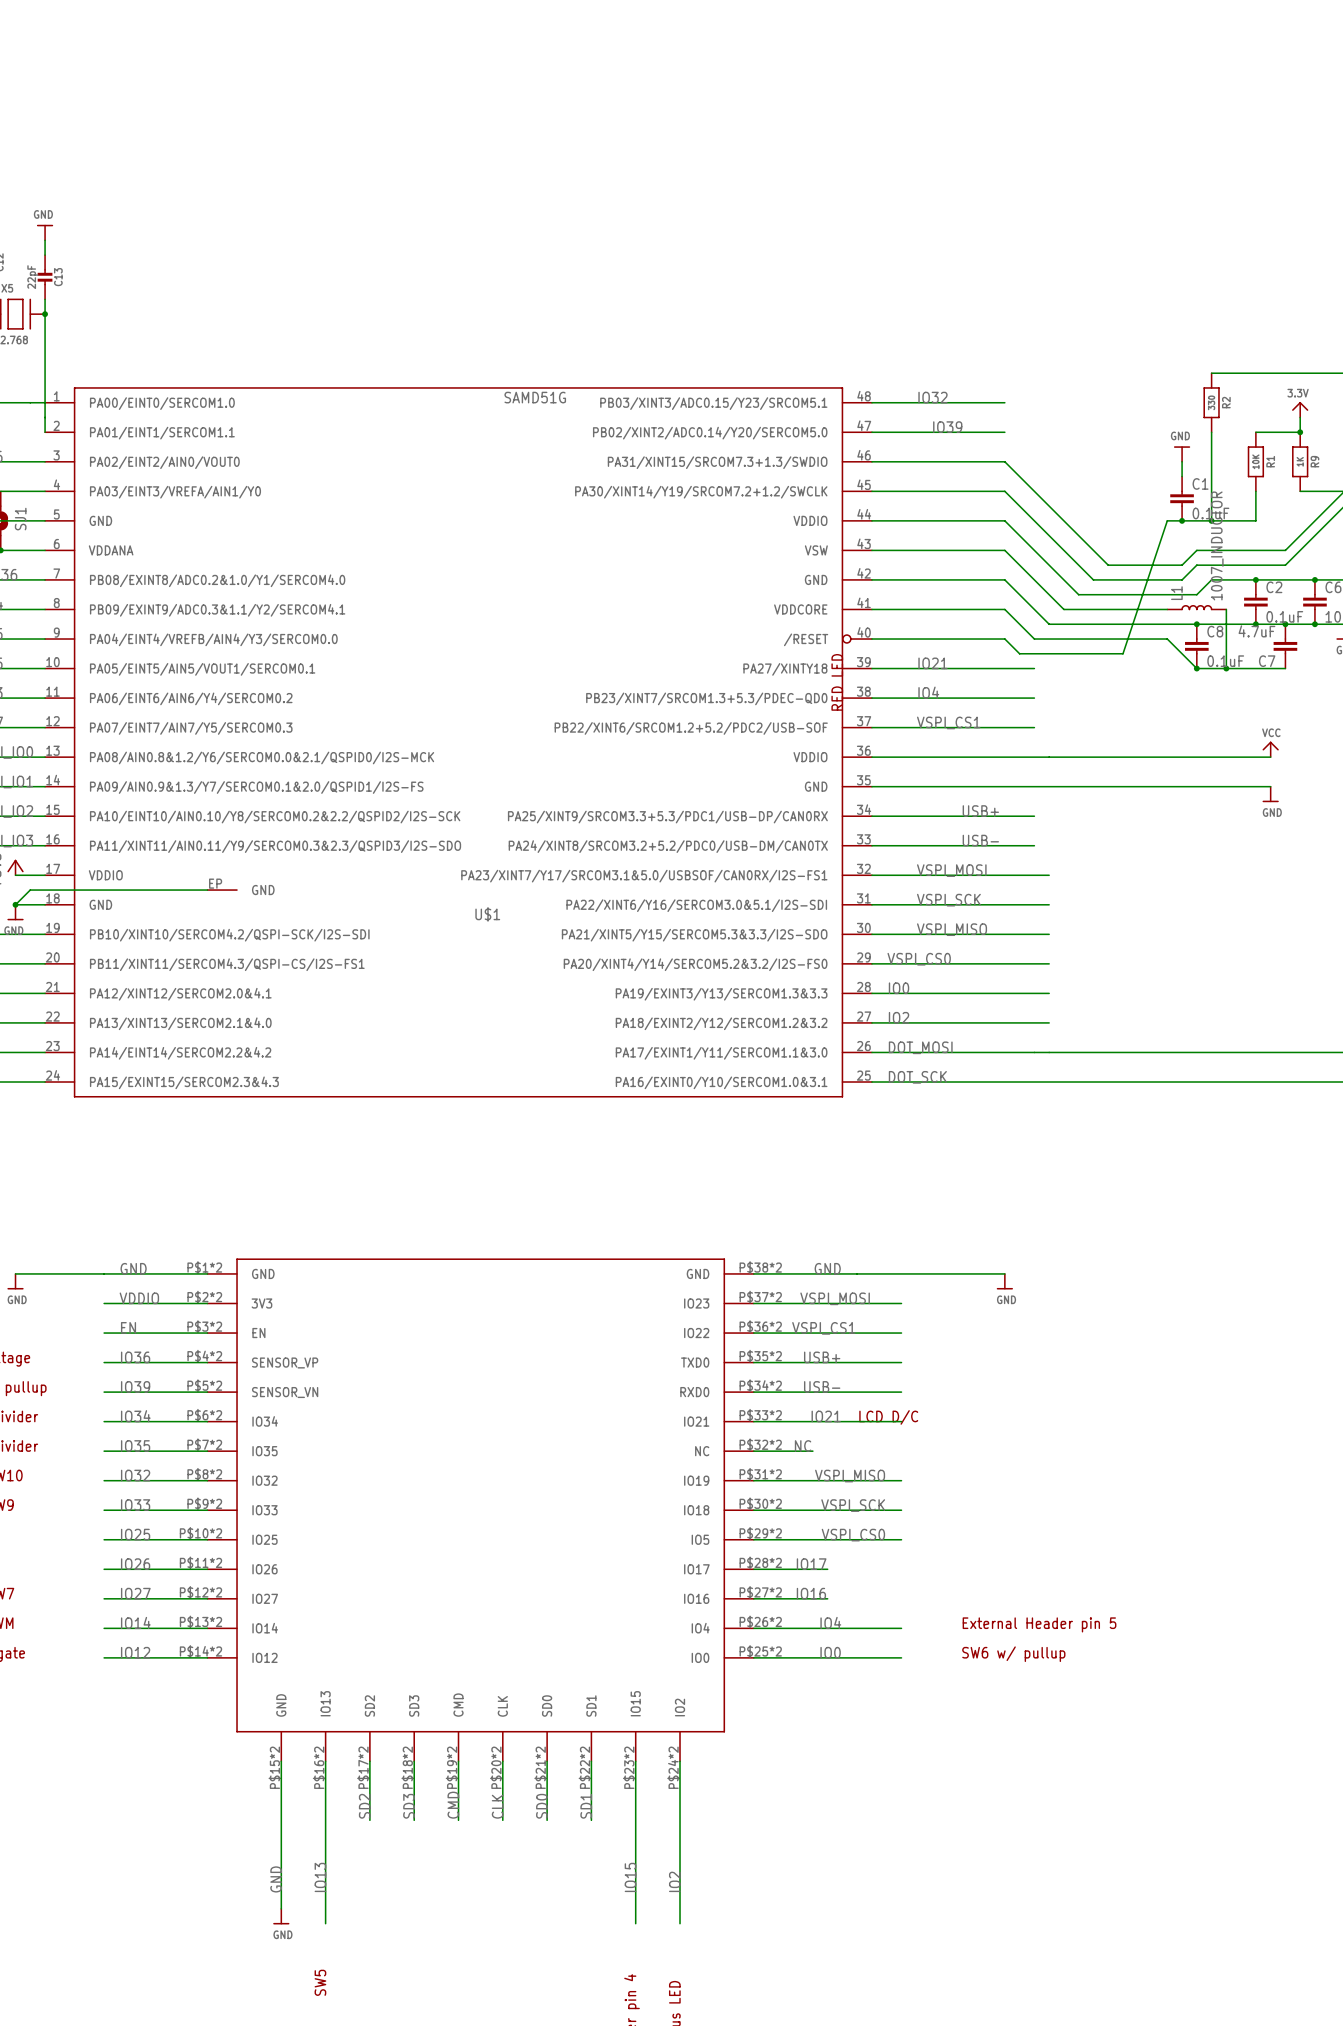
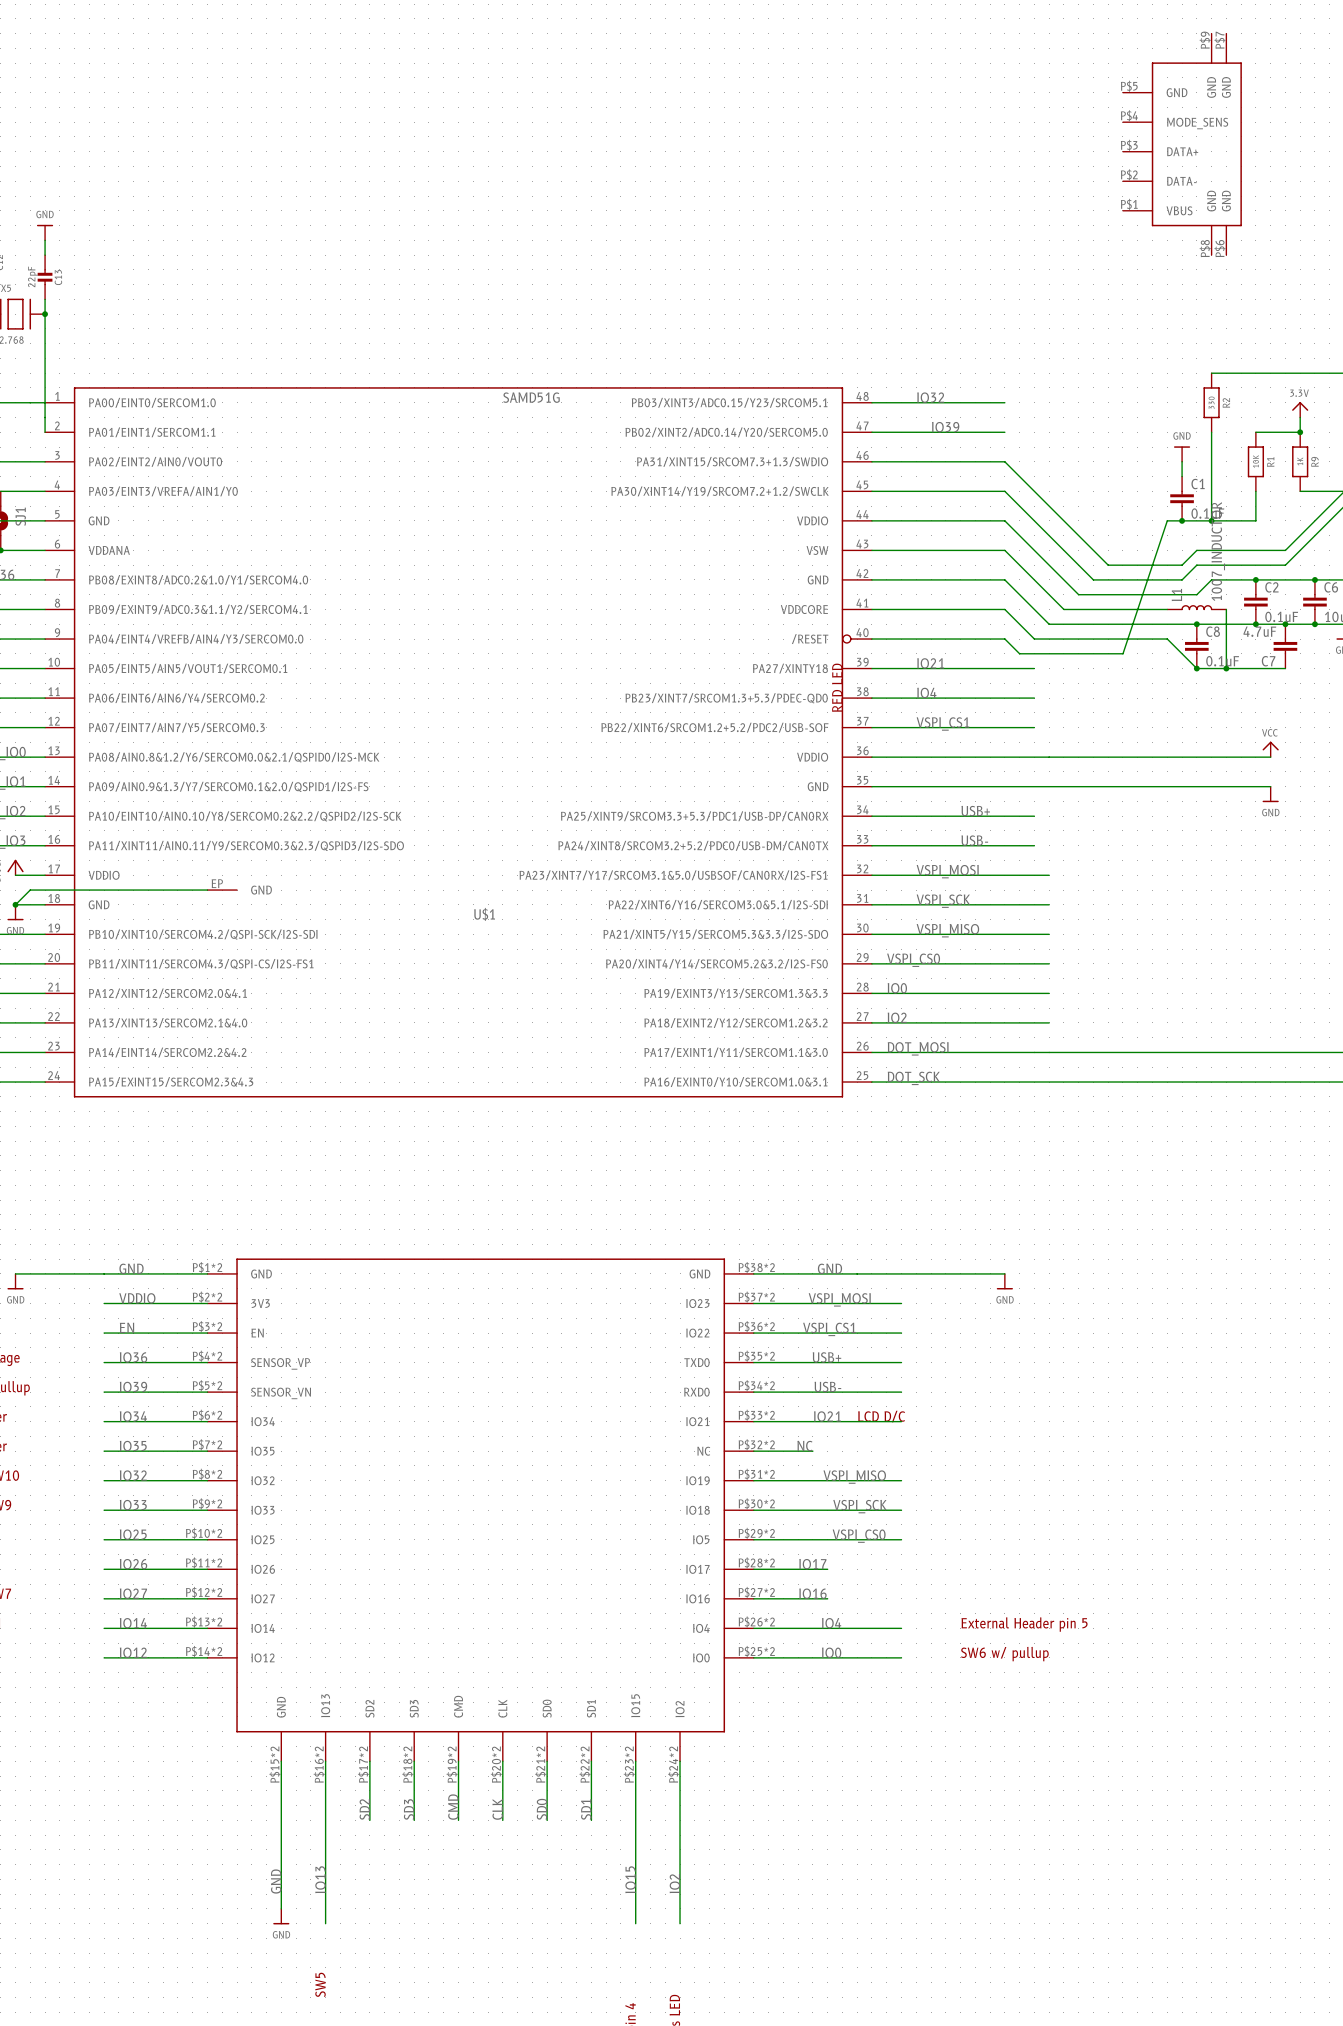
part: none -> (1182, 144)

